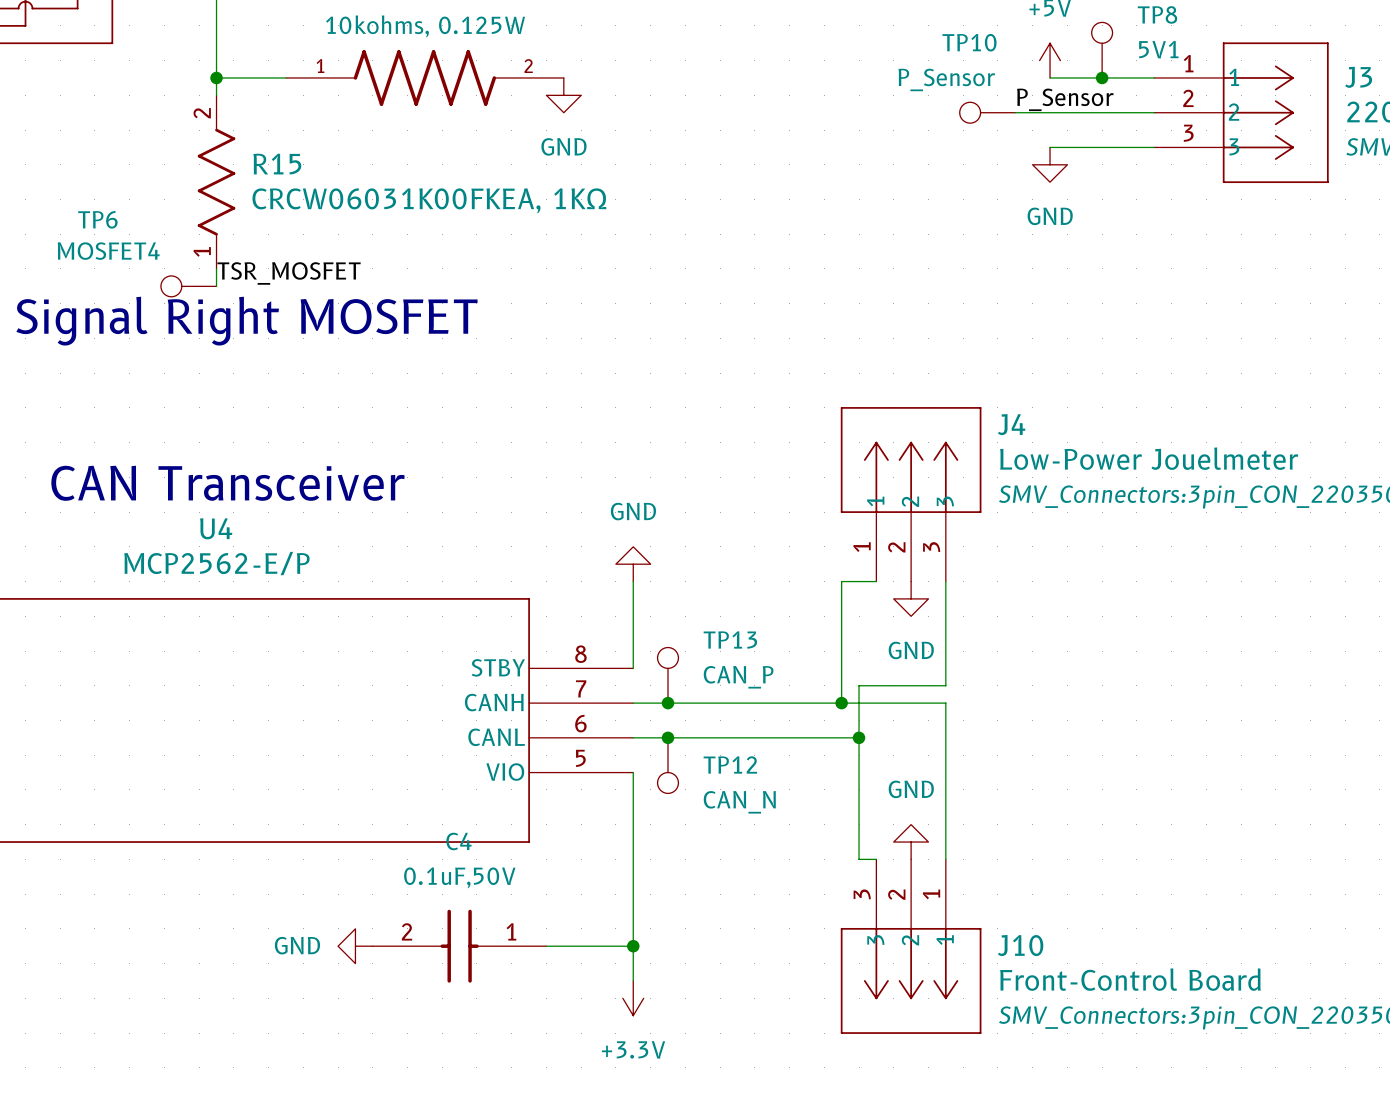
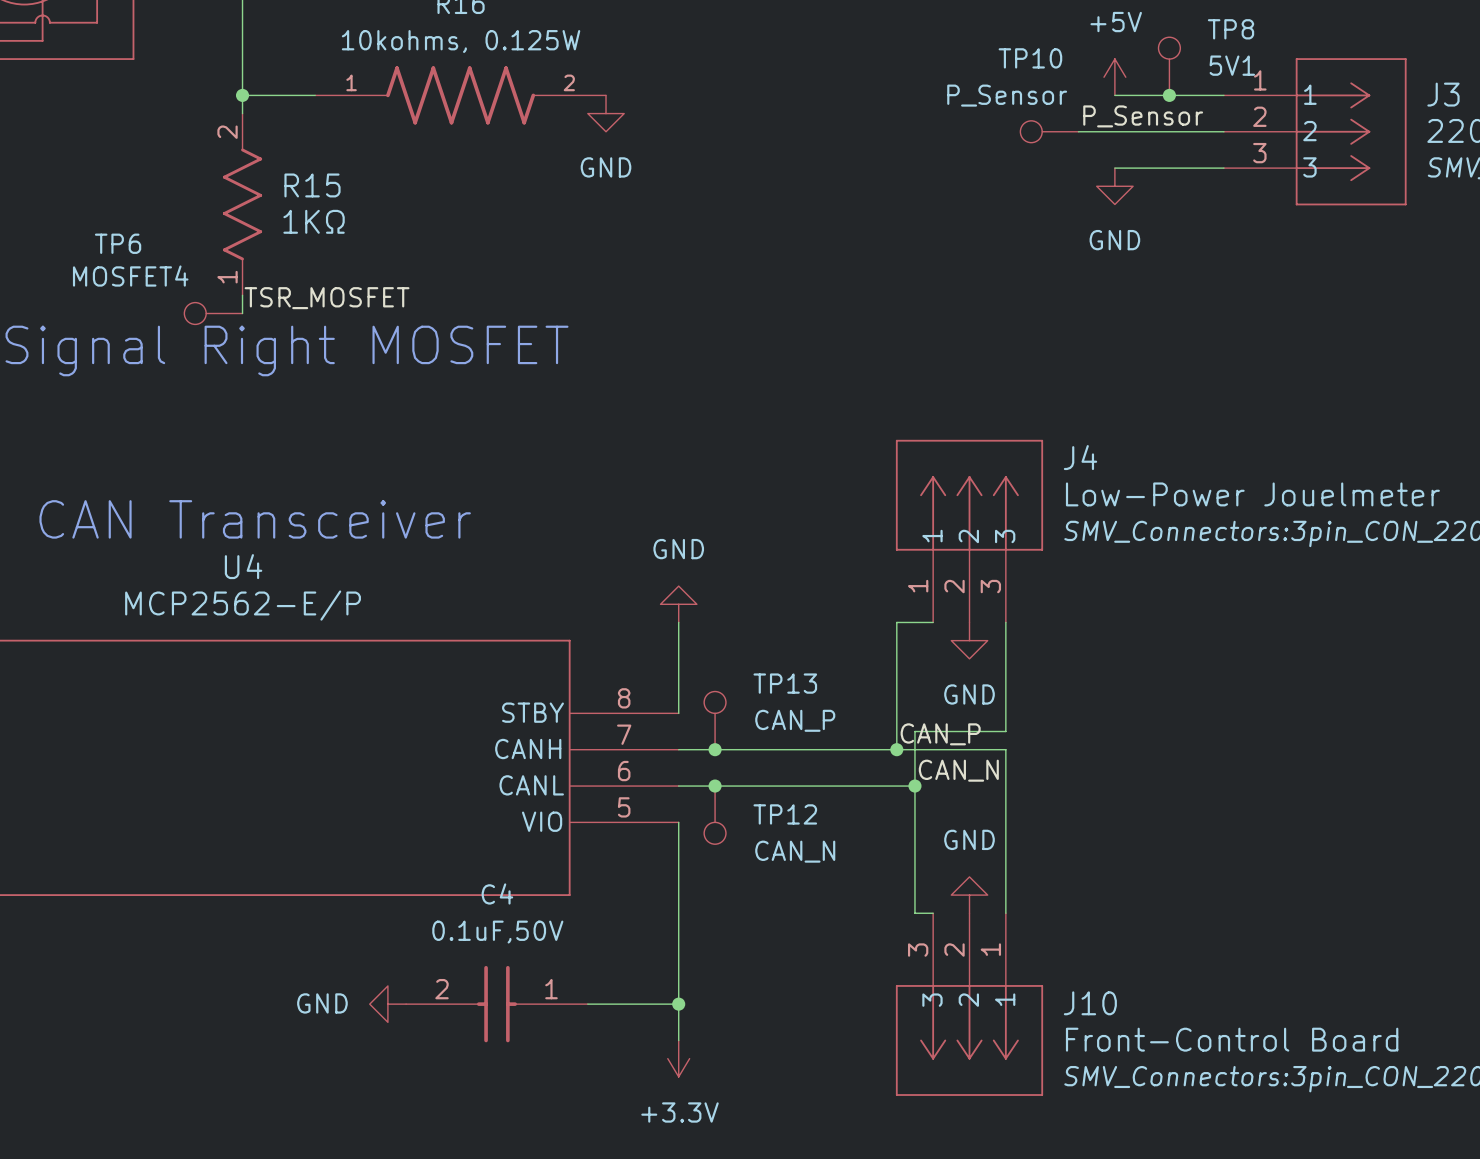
R15 value: CRCW06031K00FKEA, 1KΩ (429, 200) -> 1KΩ (314, 221)
label: none -> CAN_P (940, 734)
label: none -> CAN_N (958, 770)

